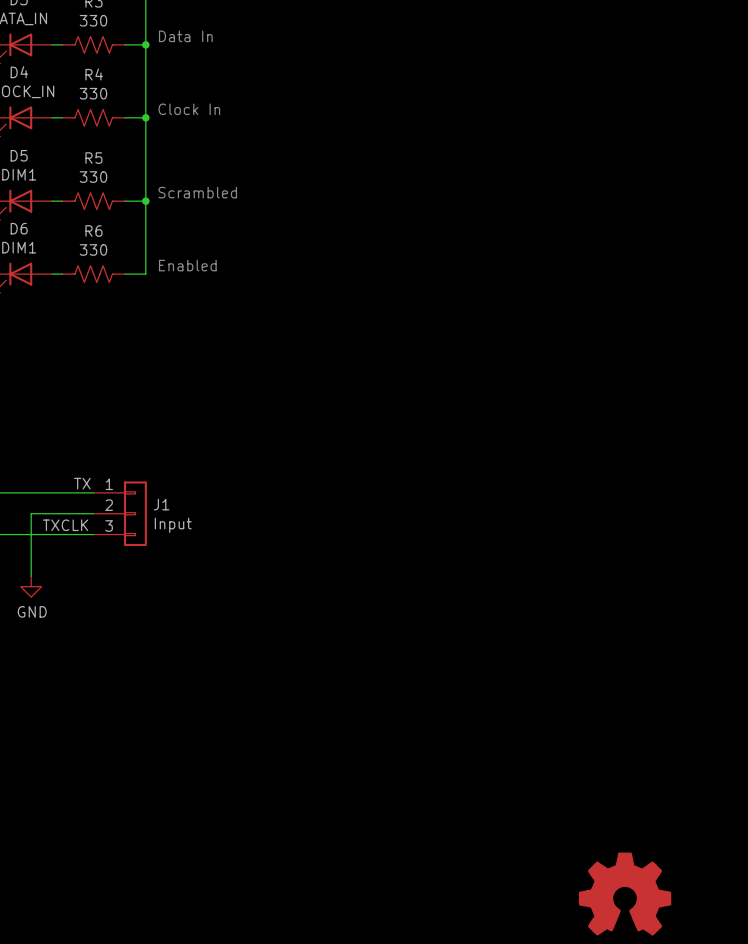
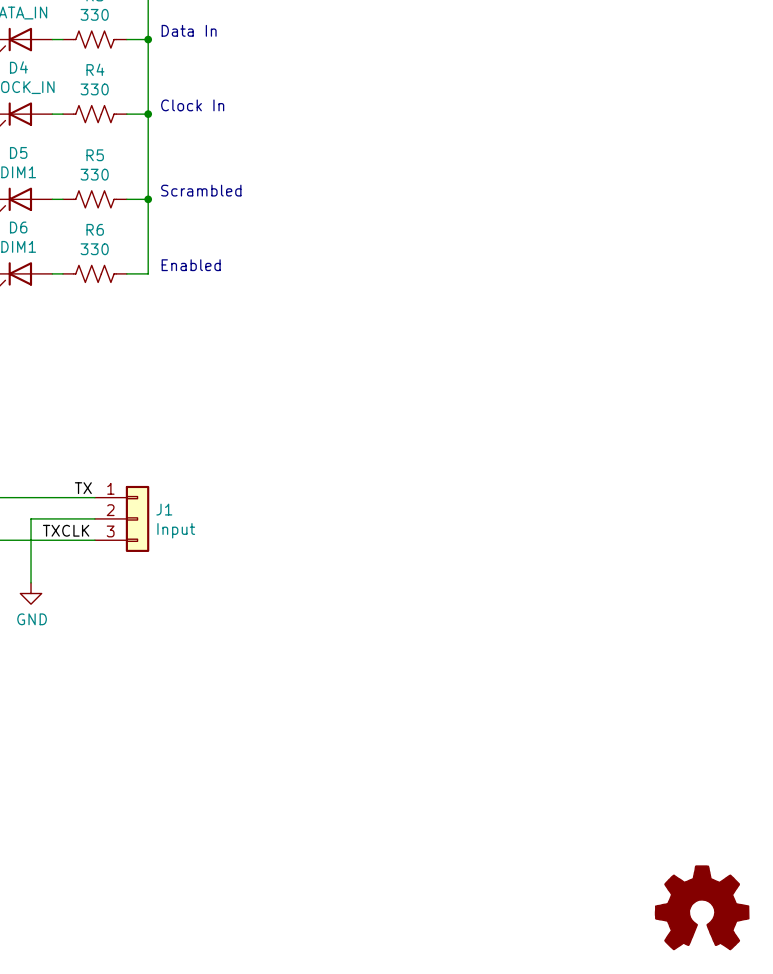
power symbol position: (625, 894) -> (702, 907)

